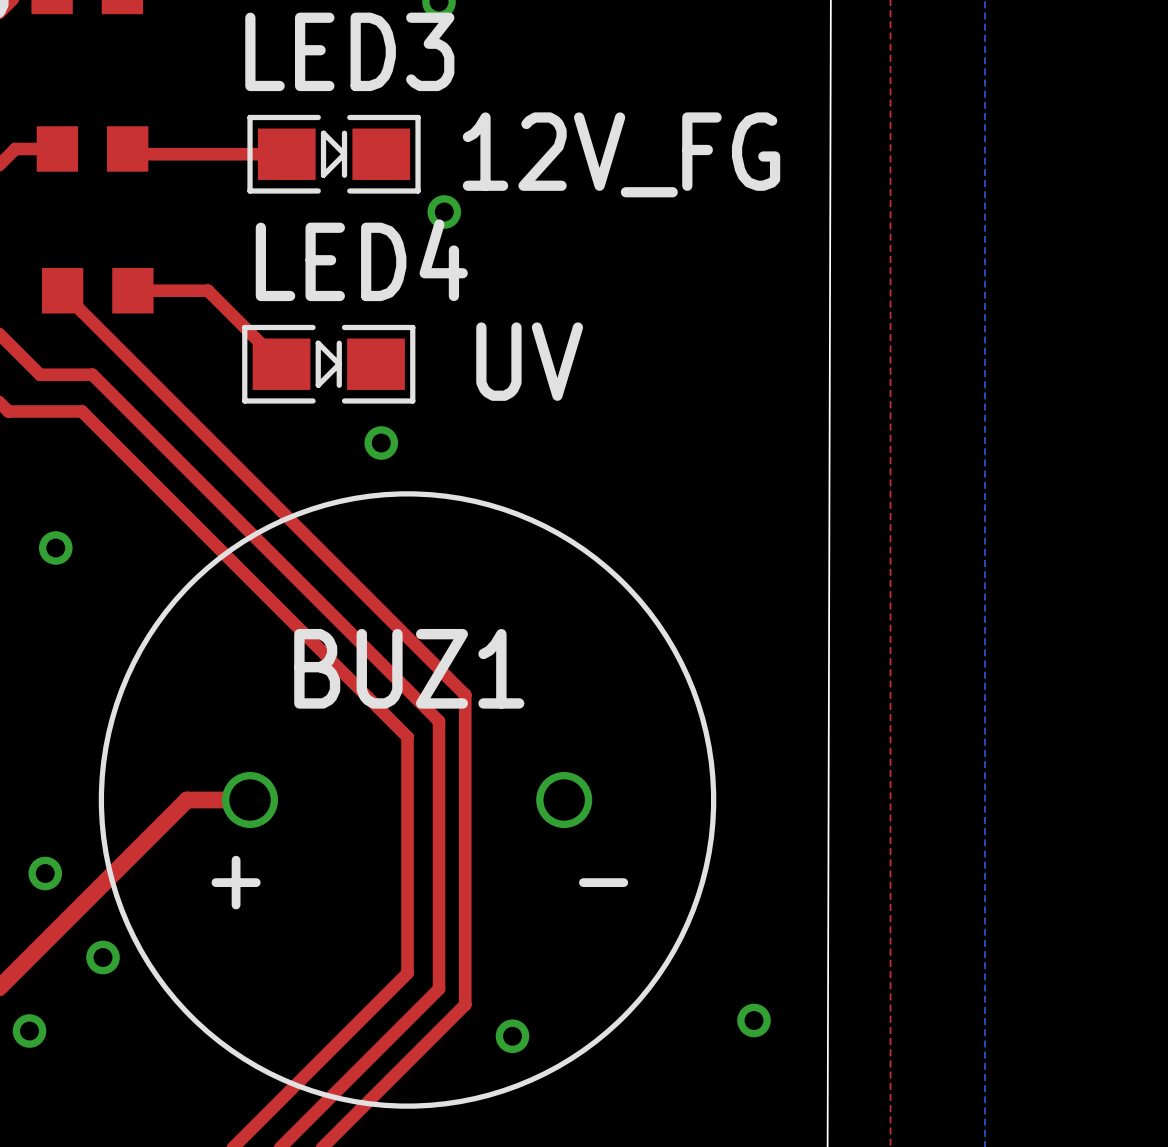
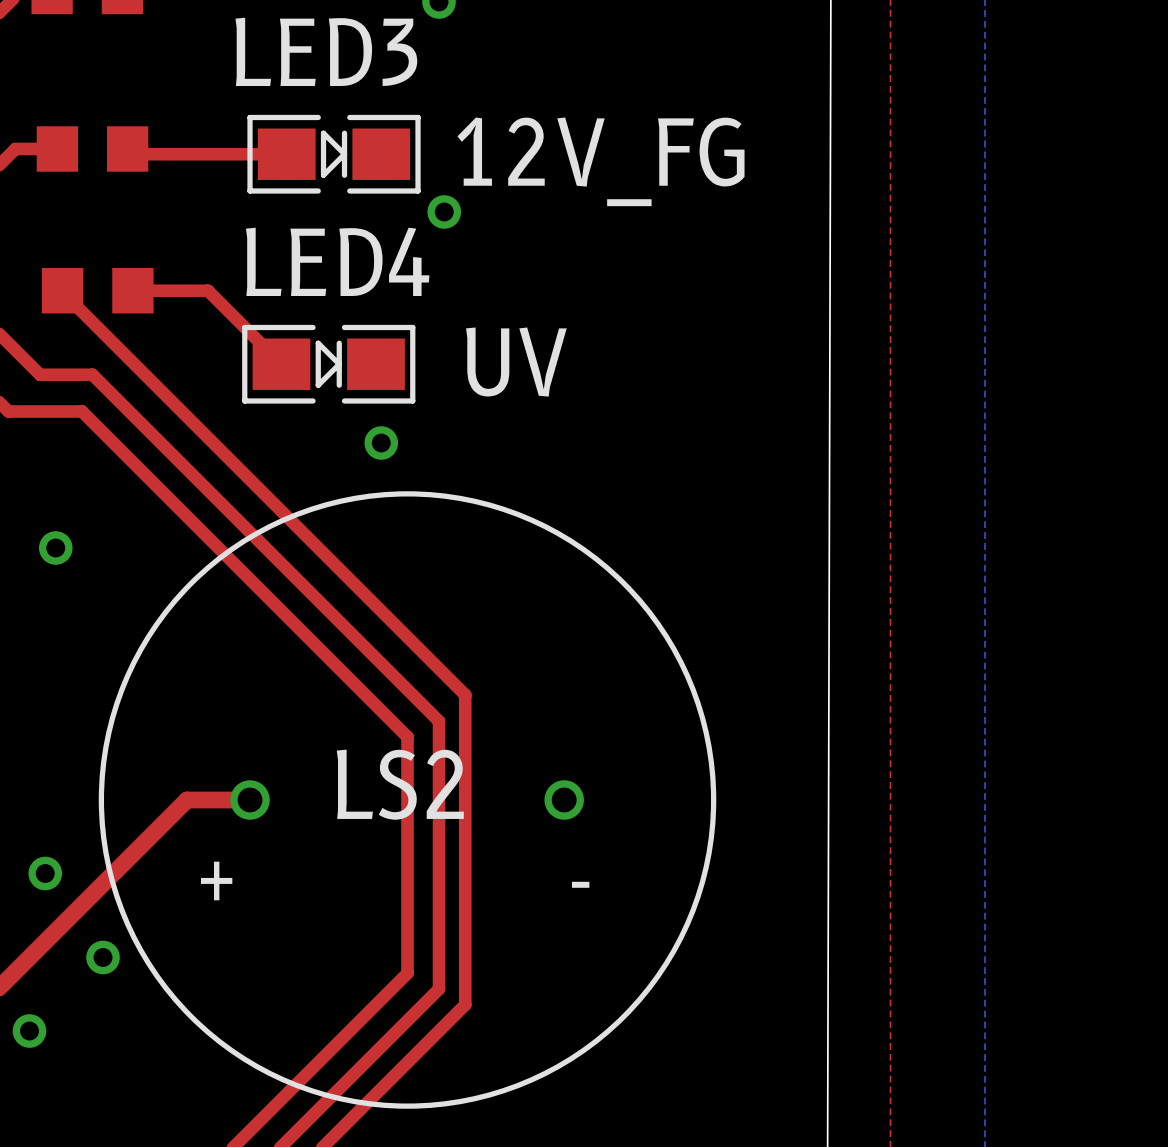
BUZ1: (407, 800) -> none
LS2: none -> (407, 800)
via: (754, 1020) -> none
via: (512, 1036) -> none

